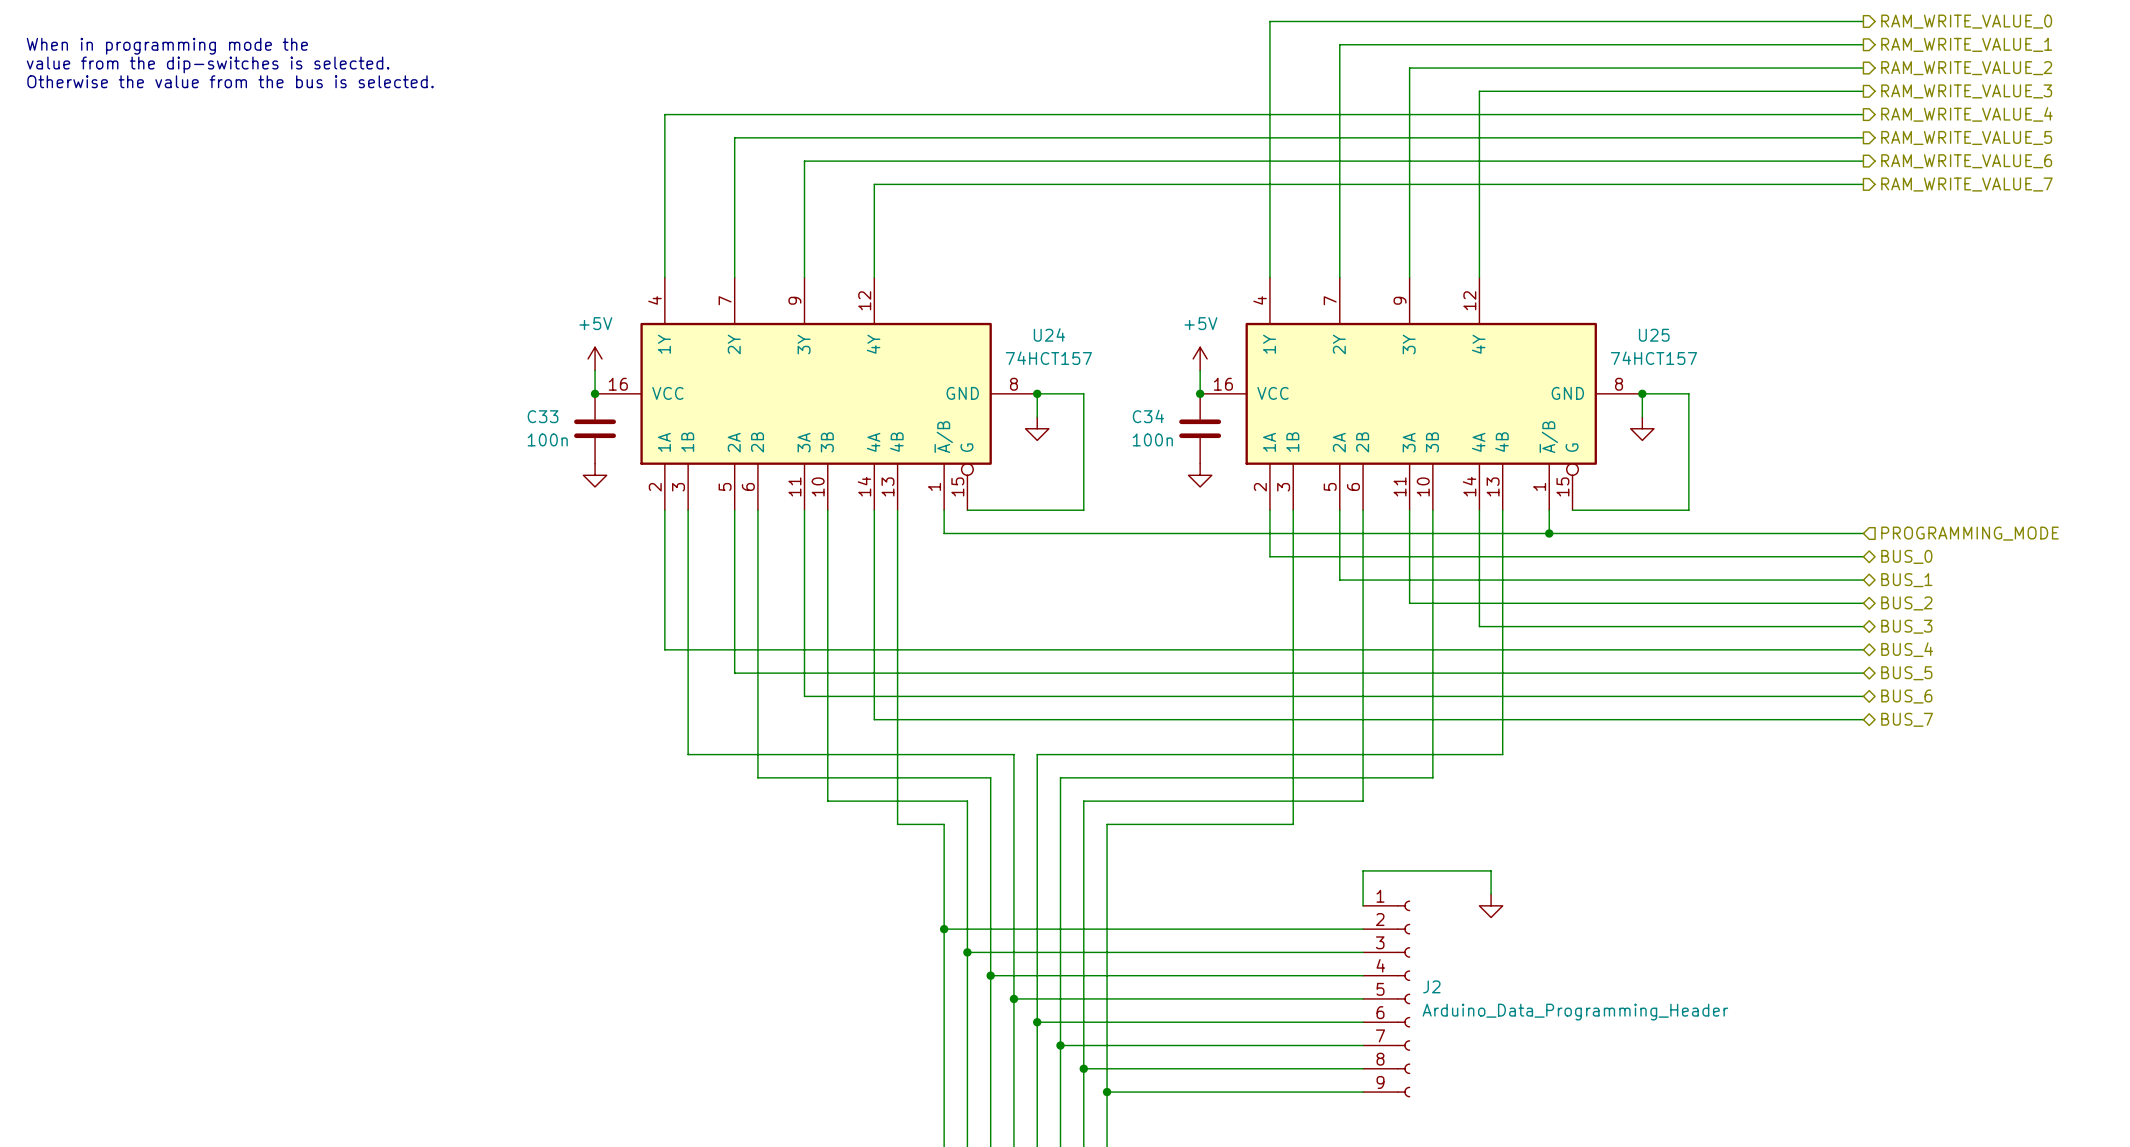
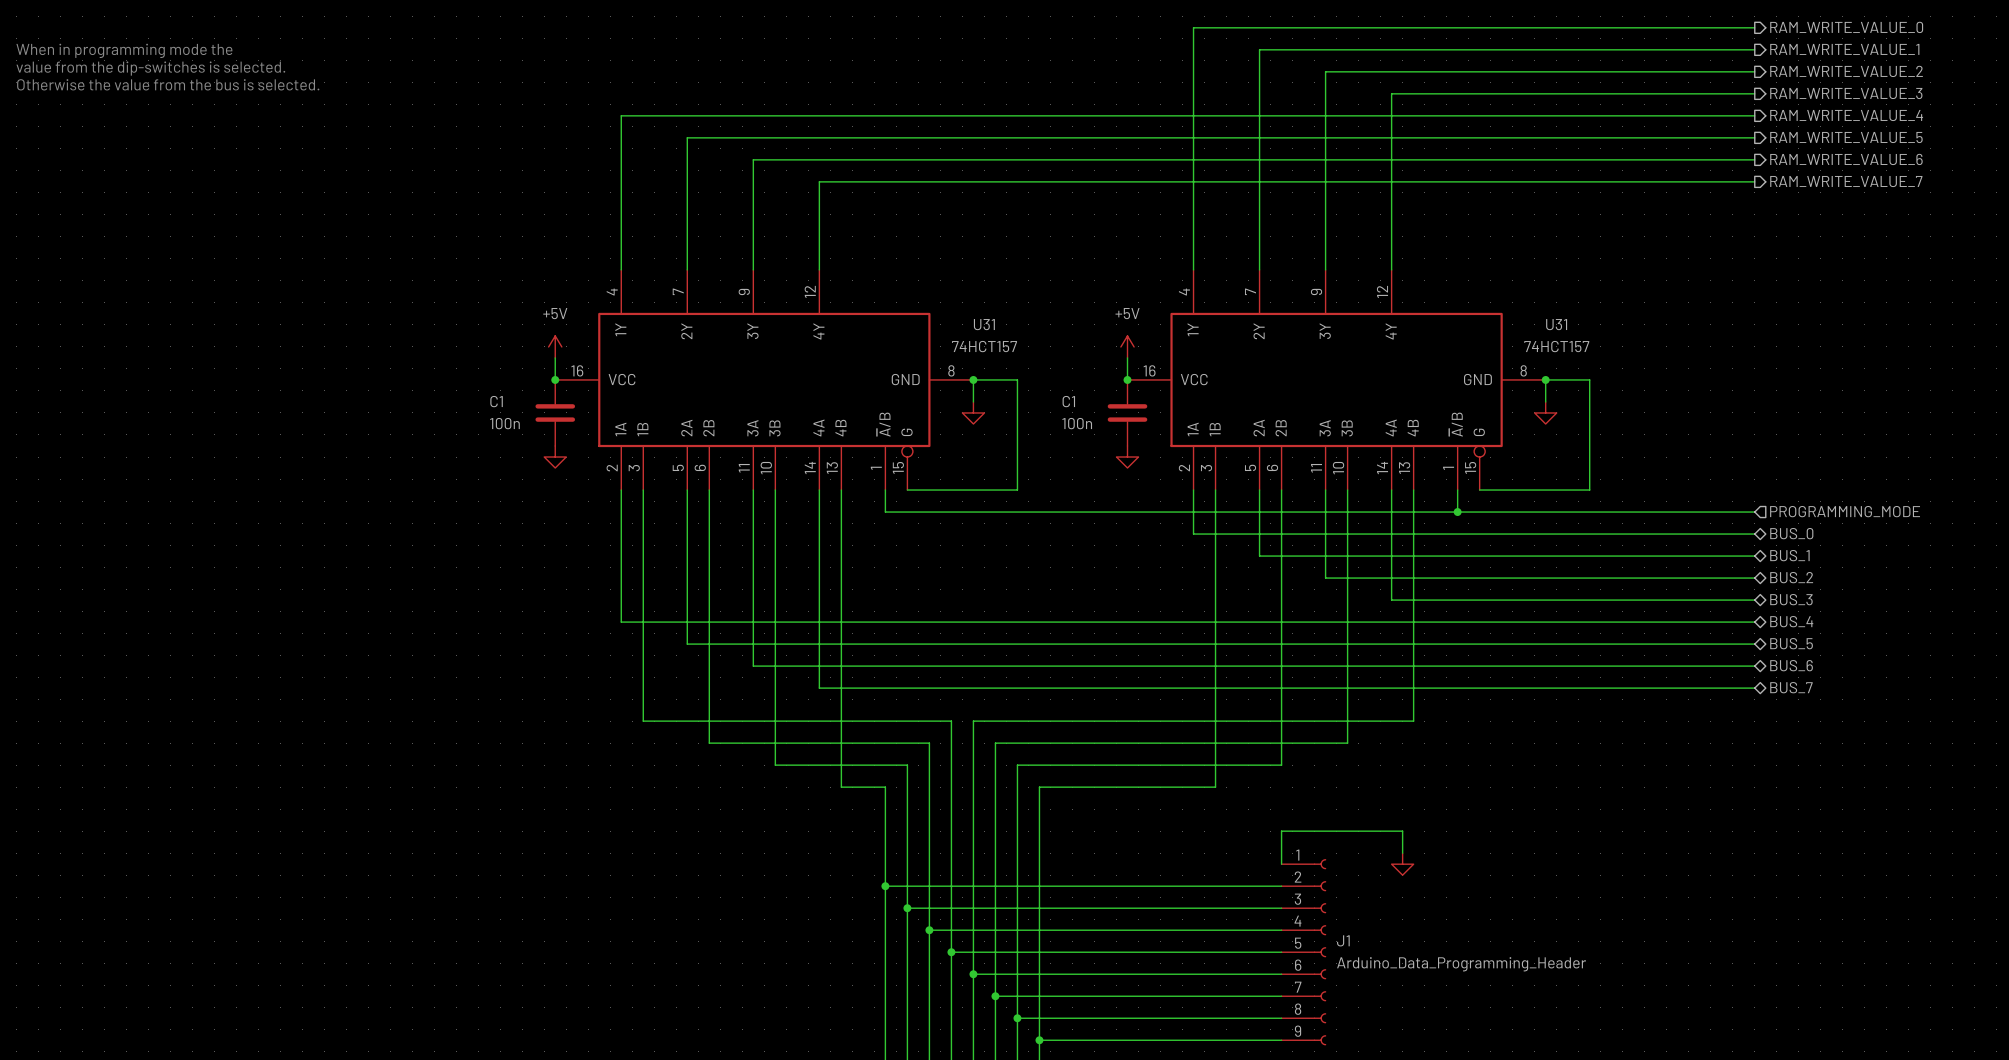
U24 name: U24 (1049, 334) -> U31 (984, 324)
U25 name: U25 (1654, 335) -> U31 (1556, 324)
C33 name: C33 (543, 416) -> C1 (496, 401)
C34 name: C34 (1148, 416) -> C1 (1068, 401)
J2 name: J2 (1431, 986) -> J1 (1343, 940)

